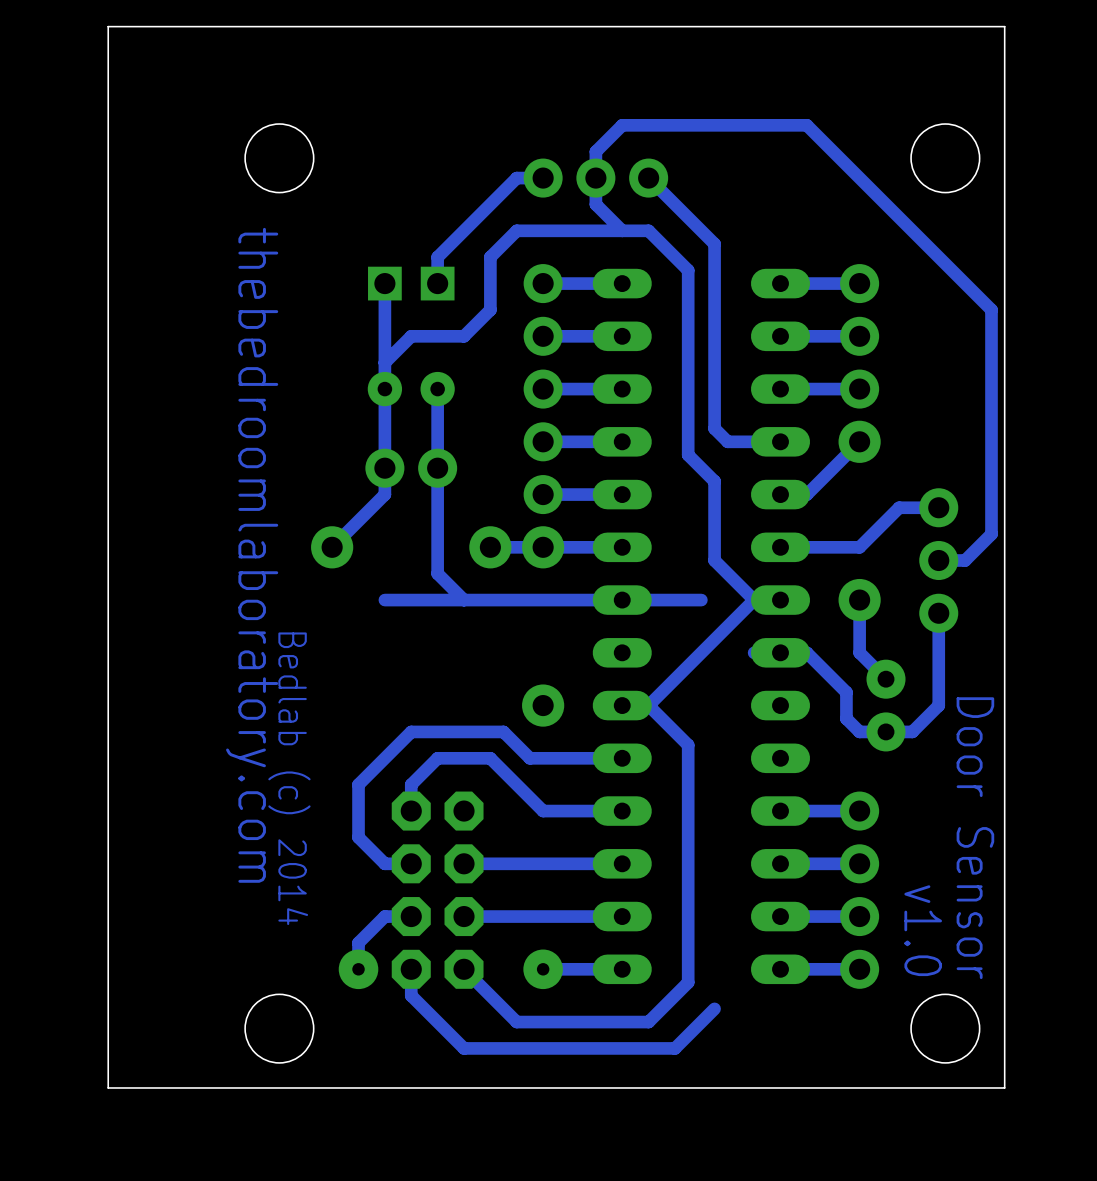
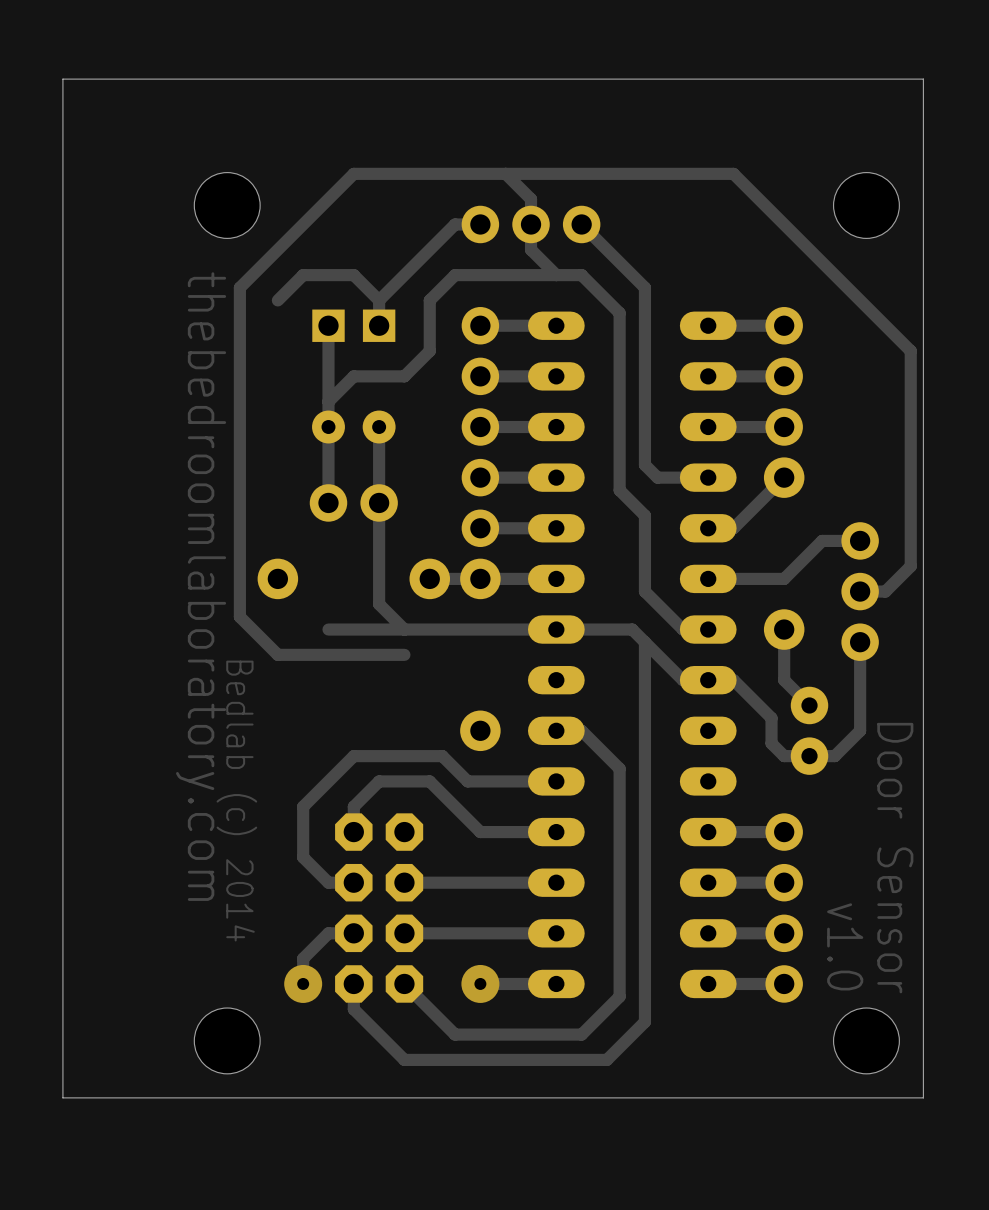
track: (622, 125) (595, 151) -> (505, 173) (531, 199)
track: none -> (556, 173) (353, 173) (239, 287) (239, 616) (277, 654) (404, 654)
track: none -> (379, 300) (353, 275) (303, 275) (277, 300)
track: (384, 468) (384, 494) (332, 547) -> none
track: none -> (632, 629) (682, 680)
track: (754, 600) (648, 705) -> none
track: none -> (644, 642) (644, 1021)

